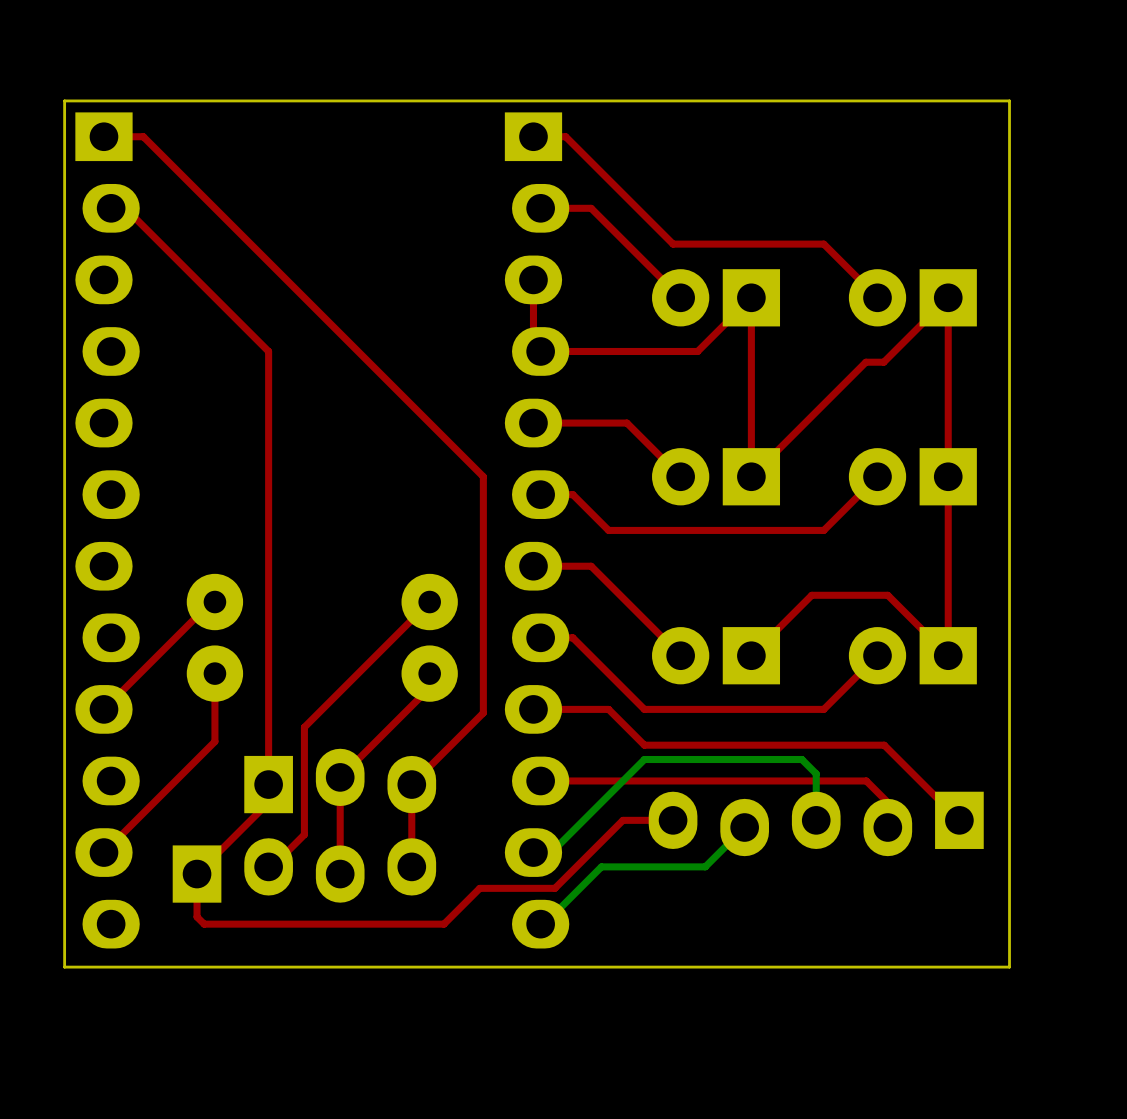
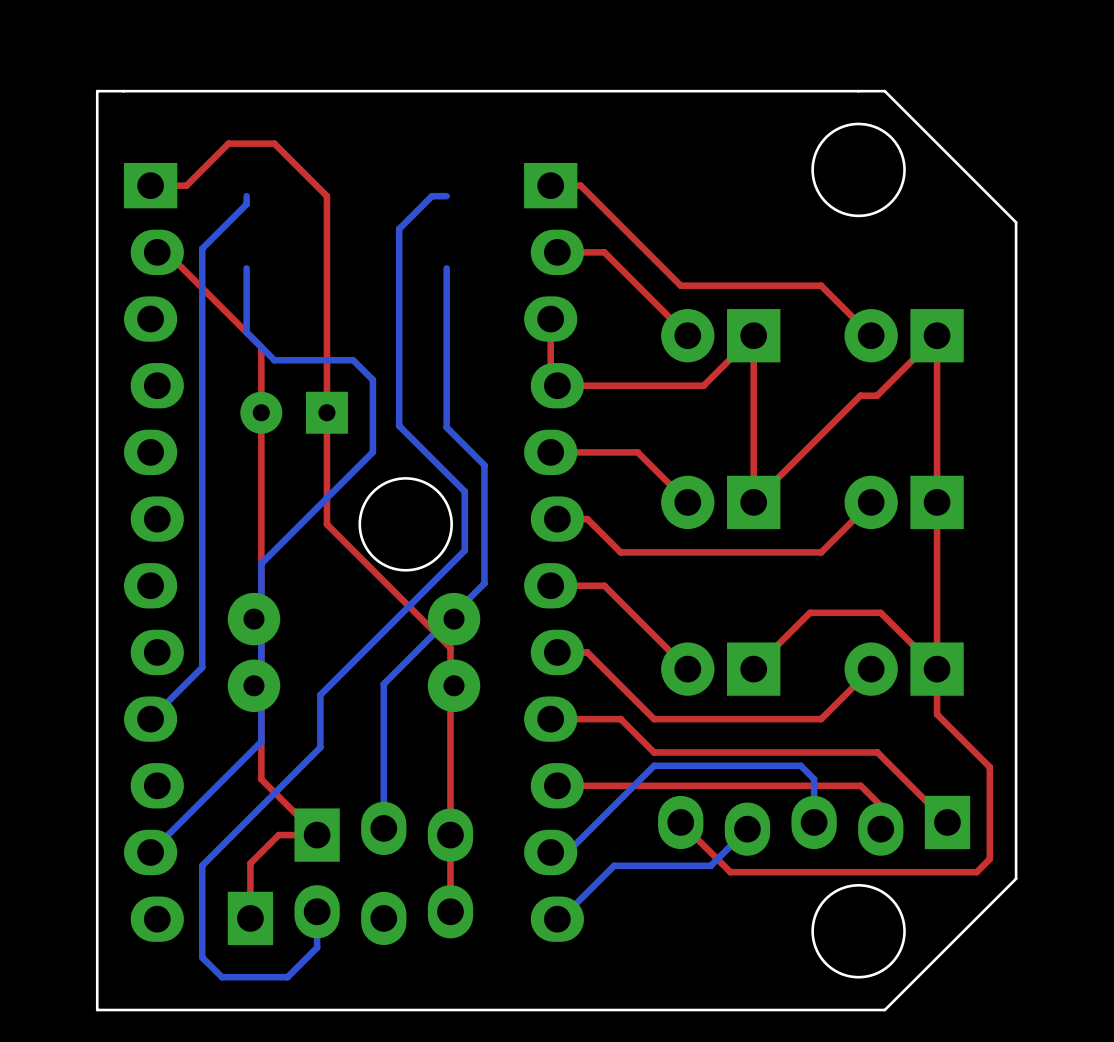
round board edge: none -> [811, 122, 906, 218]
board edge: (1009, 100) (1009, 967) (64, 967) (64, 100) (1009, 100) -> (884, 91) (1016, 222) (1016, 878) (884, 1010) (97, 1010) (97, 91) (884, 91)
top track: (142, 136) (483, 476) (483, 712) (411, 784) (411, 866) -> (186, 185) (228, 143) (274, 143) (326, 196) (326, 524) (450, 647) (450, 911)
bottom track: none -> (246, 196) (246, 204) (202, 248) (202, 667) (150, 719)
bottom track: none -> (446, 196) (431, 196) (399, 228) (399, 425) (464, 491) (464, 550) (320, 694) (320, 747) (202, 865) (202, 957) (221, 977) (287, 977) (317, 947) (317, 911)
top track: none -> (166, 252) (261, 347) (261, 779) (317, 835) (278, 835) (250, 863) (250, 918)
top track: (125, 208) (268, 351) (268, 802) (197, 874) (197, 916) (204, 924) (444, 924) (479, 888) (554, 888) (622, 820) (673, 820) -> (937, 669) (937, 714) (989, 767) (989, 859) (976, 872) (730, 872) (680, 822)
bottom track: none -> (246, 268) (246, 332) (274, 360) (353, 360) (372, 379) (372, 452) (261, 563) (261, 741) (150, 852)
bottom track: none -> (446, 268) (446, 427) (484, 465) (484, 583) (383, 684) (383, 828)
part: none -> (294, 412)
round board edge: none -> [358, 477, 453, 572]
top track: (214, 602) (211, 602) (103, 709) -> none
top track: (429, 602) (304, 727) (304, 834) (272, 866) (268, 866) -> none
top track: (214, 673) (214, 741) (103, 852) -> none
top track: (429, 673) (429, 687) (340, 777) (340, 874) -> none
part position: (340, 780) -> (383, 831)
part position: (304, 870) -> (350, 915)
round board edge: none -> [811, 883, 906, 979]

